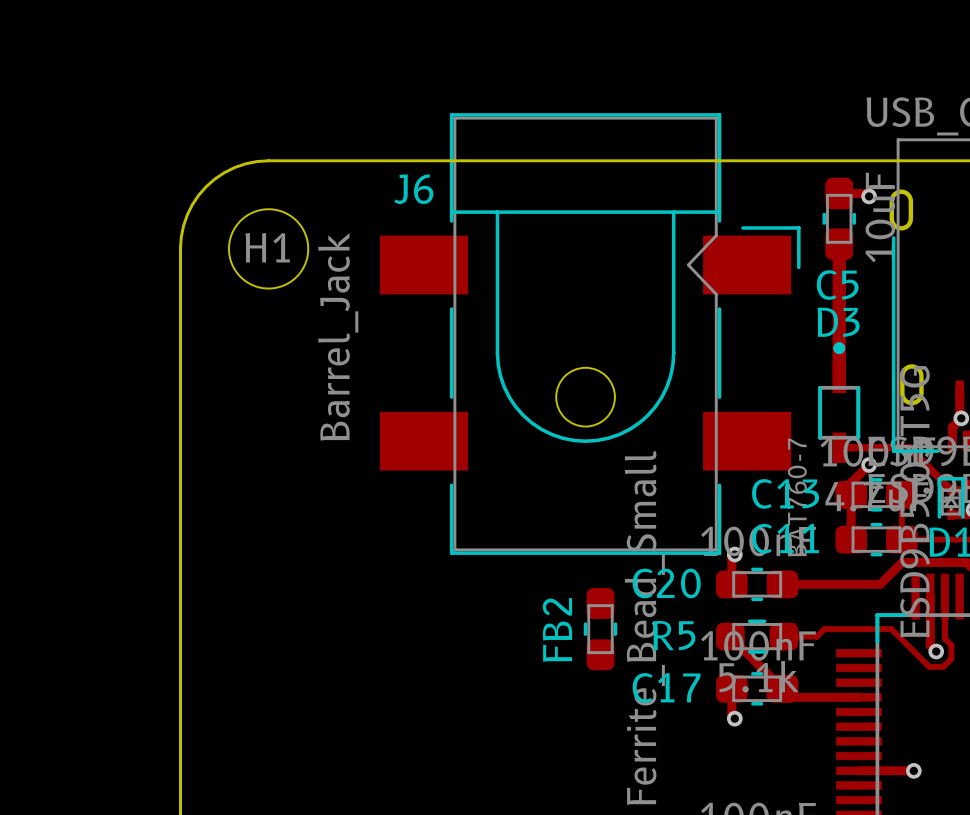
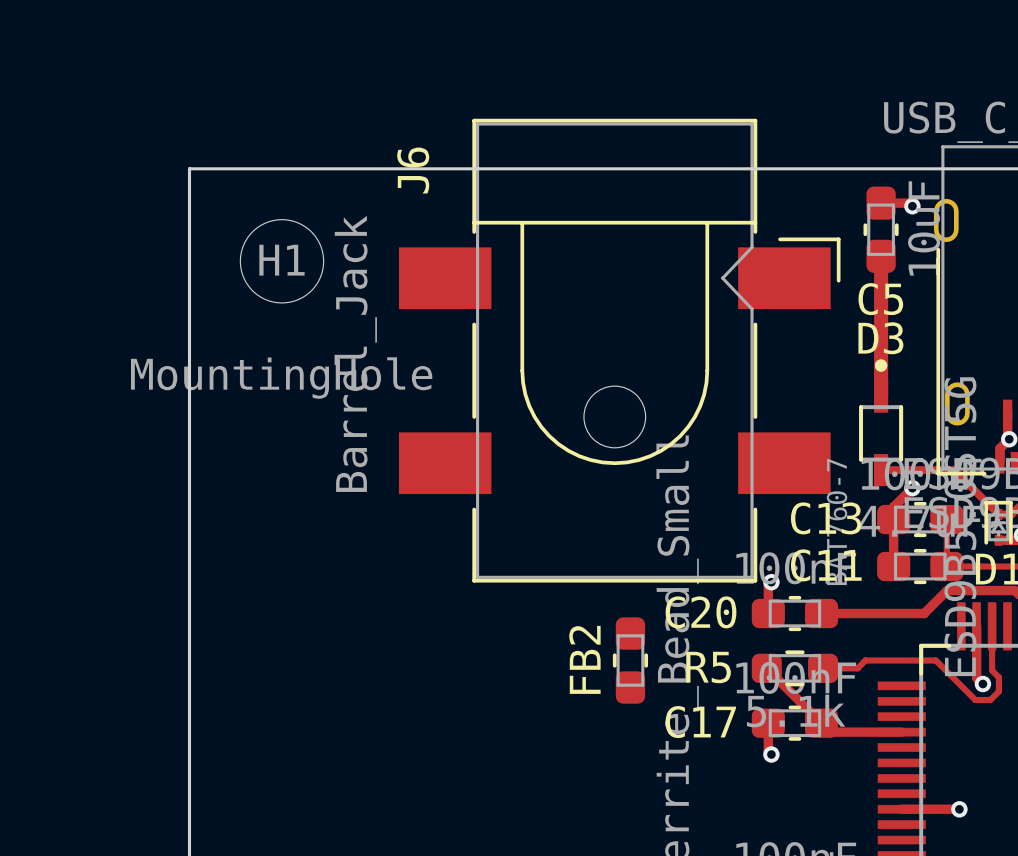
board edge: (268, 160) (245, 163) (234, 167) (214, 178) (206, 186) (198, 195) (187, 215) (181, 237) (180, 248) -> (282, 168) (189, 168) (189, 261)
J6 name rotation: 0° (413, 189) -> 90° counterclockwise (413, 170)
H1 value: none -> MountingHole (281, 378)

